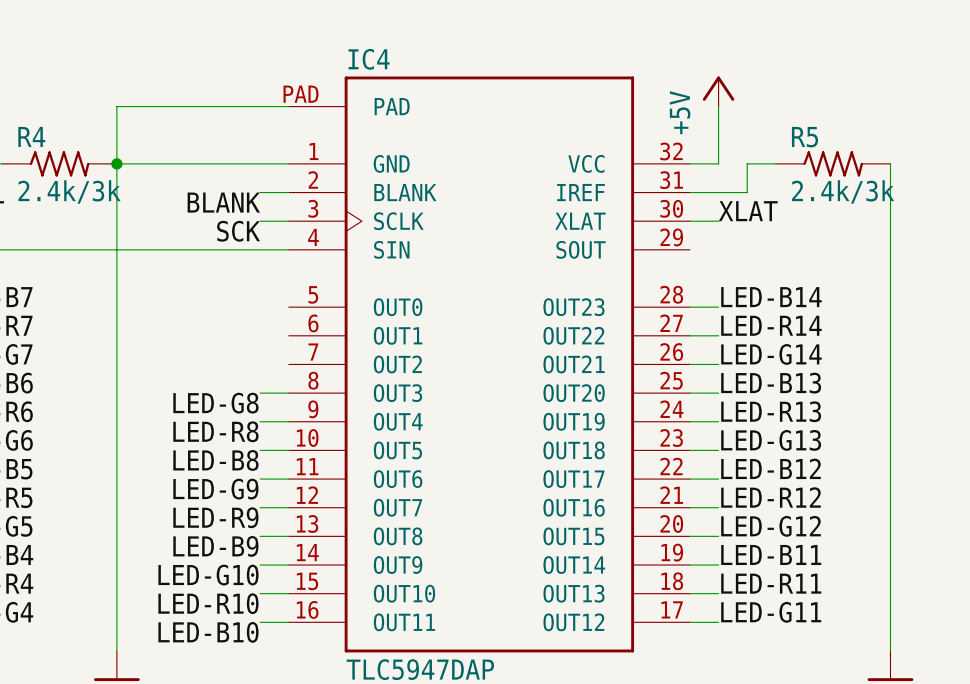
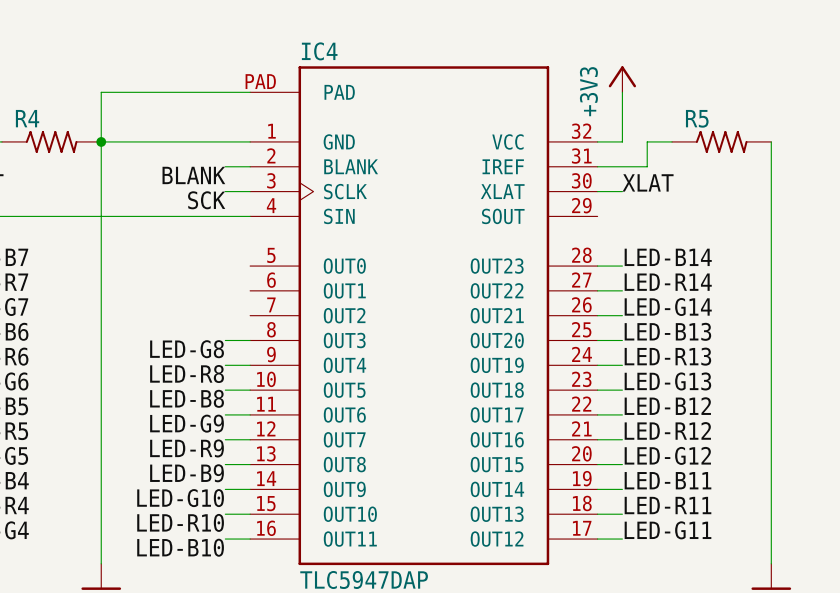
power symbol: +5V (718, 91) -> +3V3 (622, 79)
R4 value: 2.4k/3k (69, 191) -> none
R5 value: 2.4k/3k (843, 191) -> none

